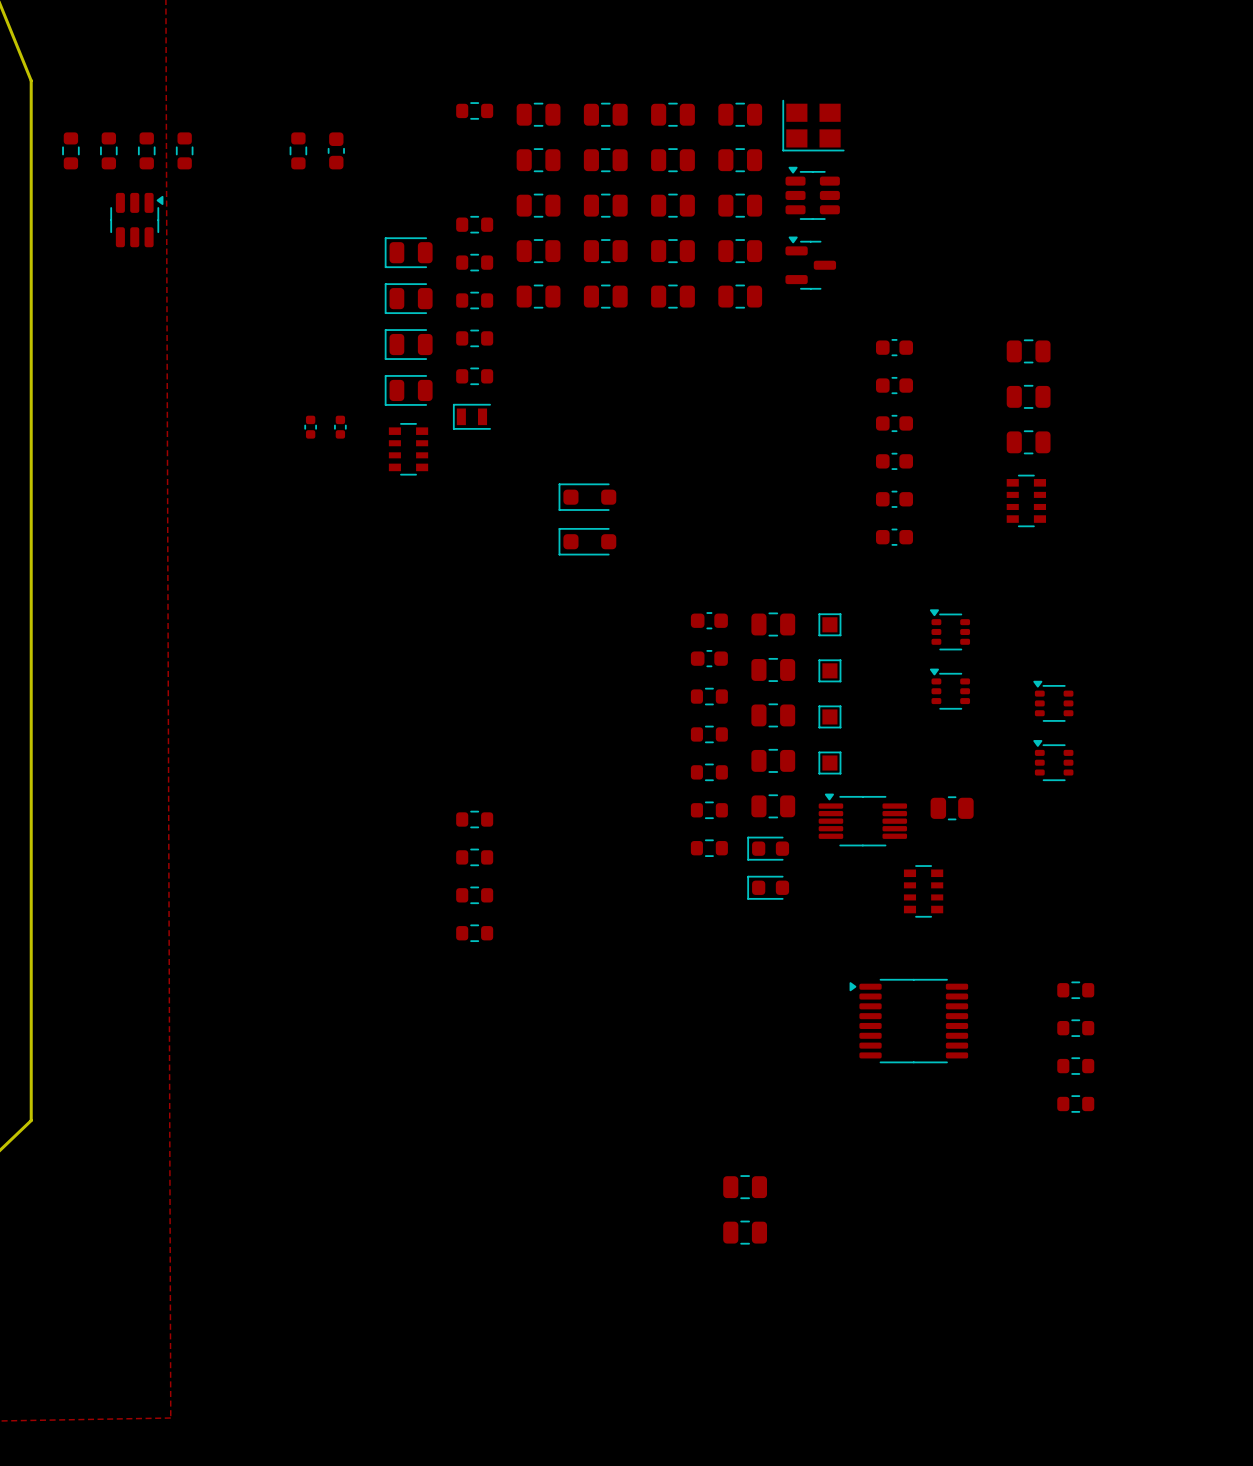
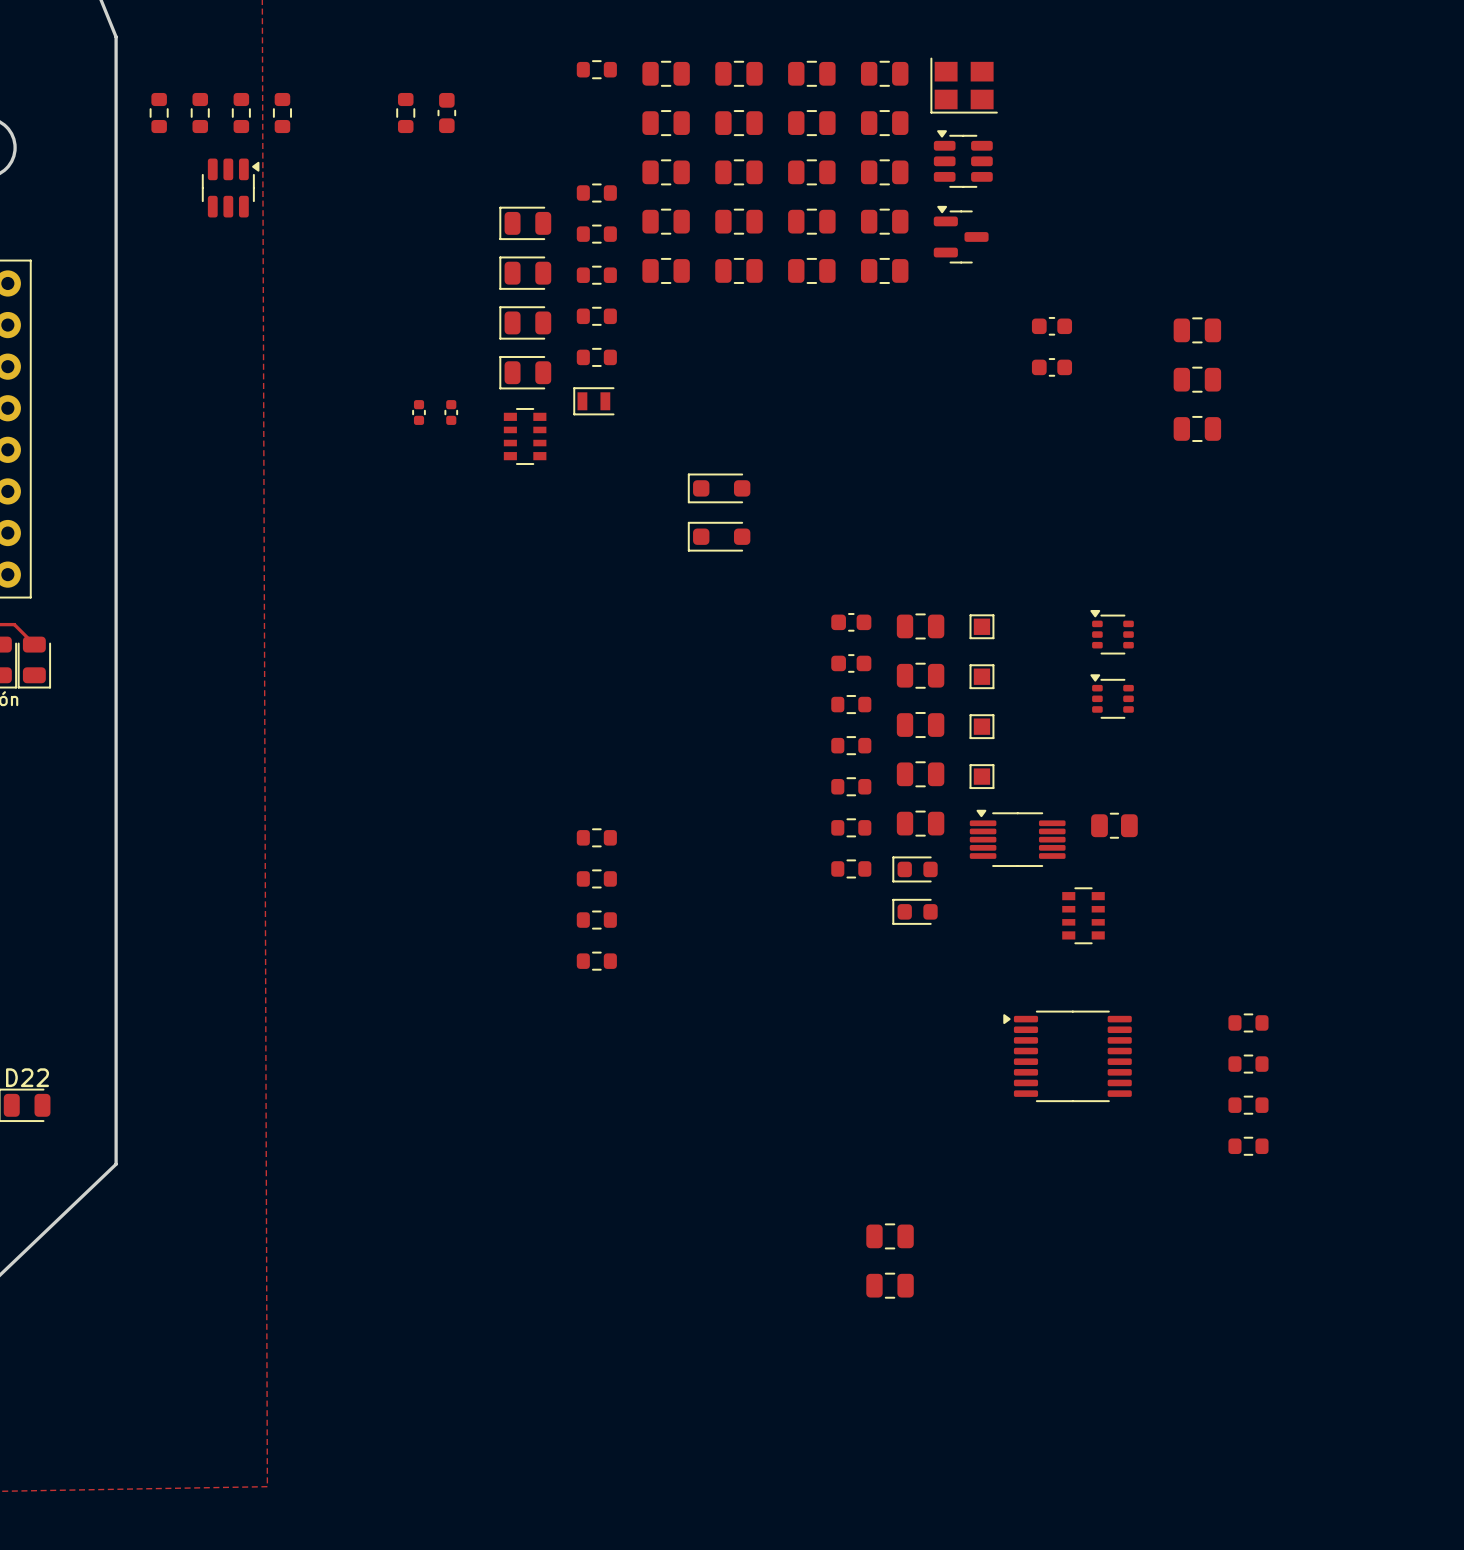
part: (894, 423) -> none
part: (894, 461) -> none
part: (894, 499) -> none
part: (1026, 500) -> none
part: (894, 537) -> none
part: (1053, 701) -> none
part: (1053, 760) -> none

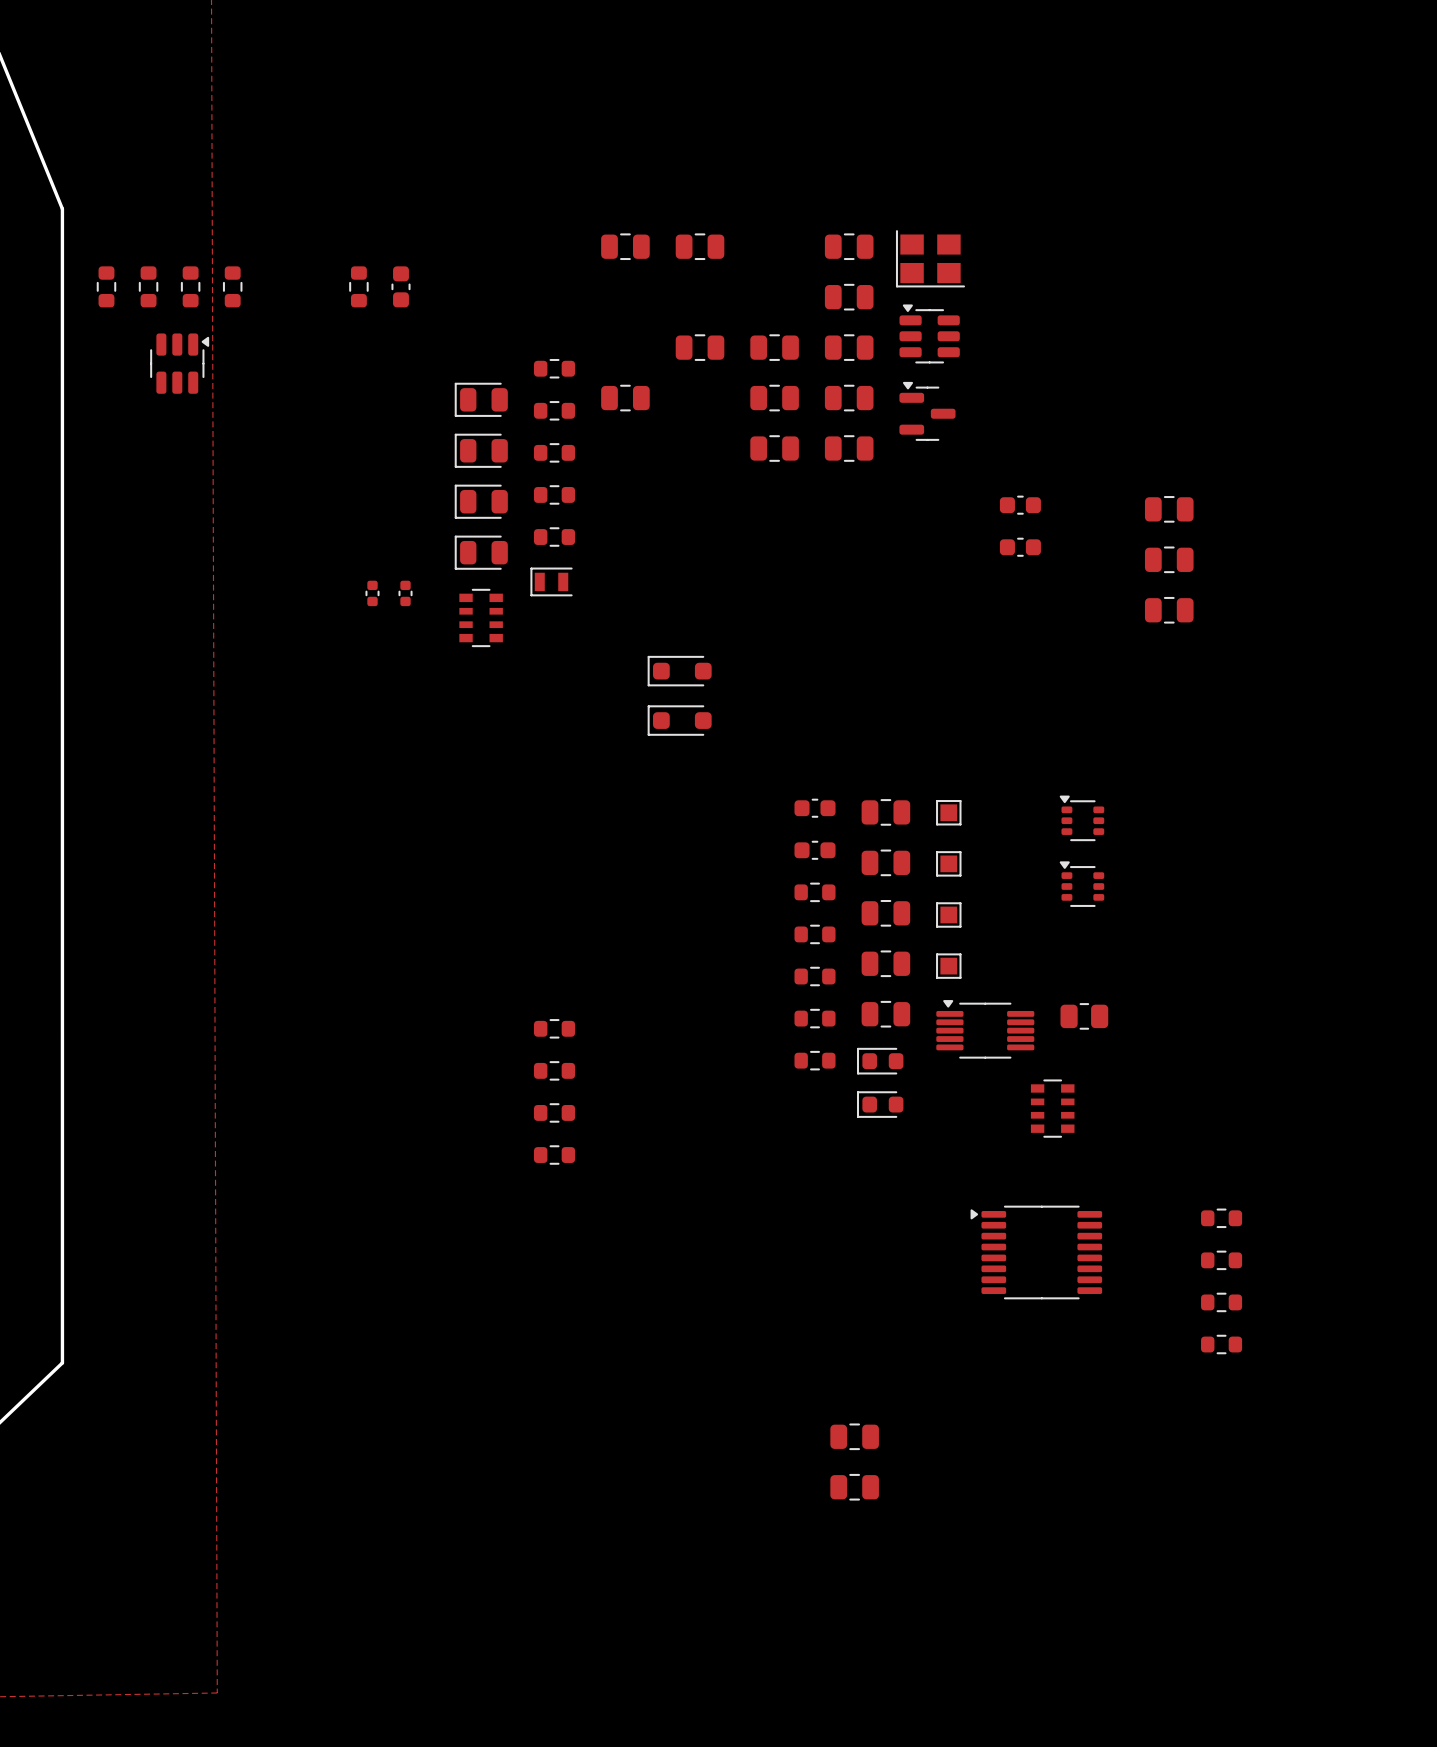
part: (596, 69) -> none
part: (811, 73) -> none
part: (666, 123) -> none
part: (738, 123) -> none
part: (811, 123) -> none
part: (666, 172) -> none
part: (738, 221) -> none
part: (666, 270) -> none
part: (738, 270) -> none

